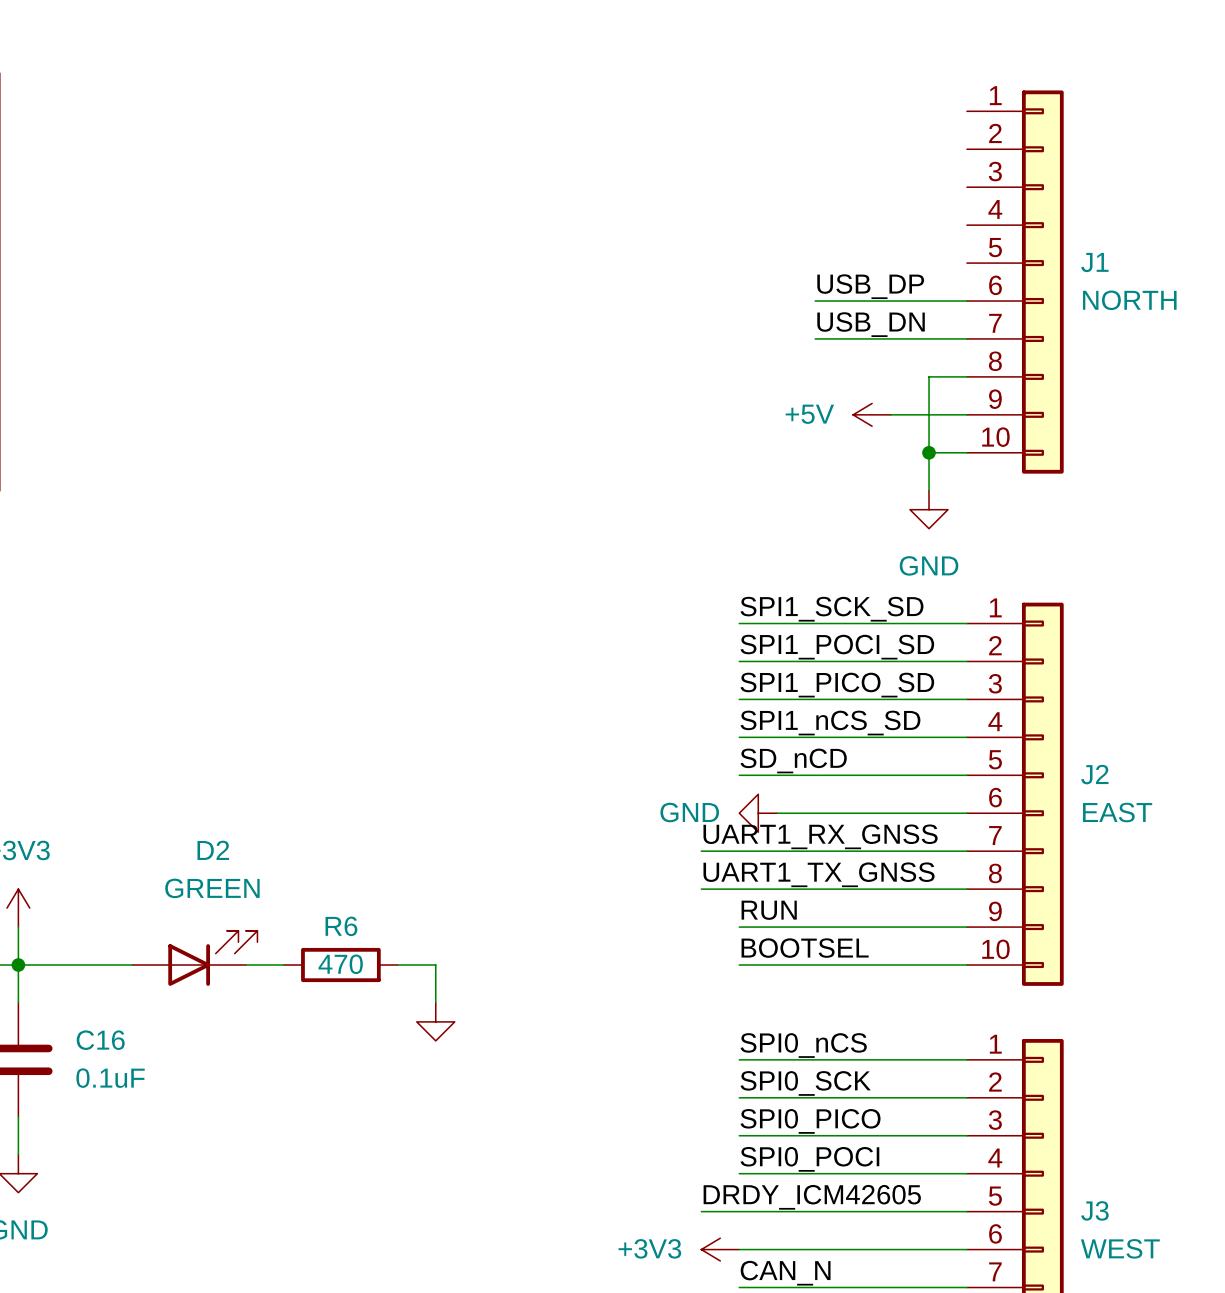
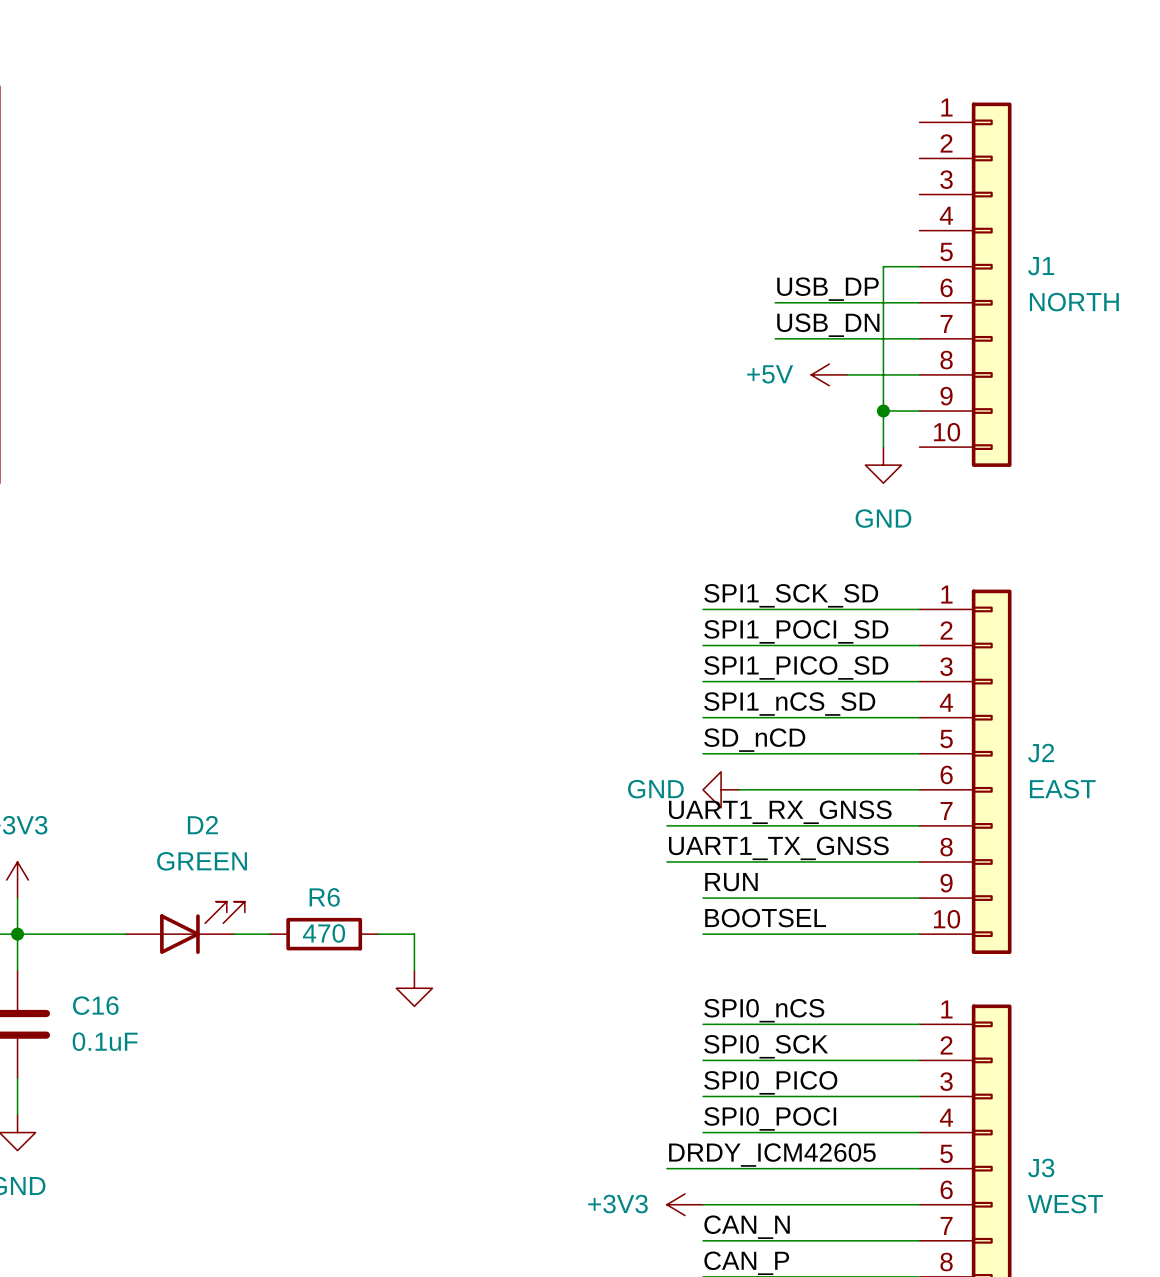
wire: none -> (919, 266) (883, 266) (883, 374) (847, 374)
power symbol position: +5V (872, 414) -> +5V (829, 374)
wire: (891, 414) (929, 414) -> none
junction position: (929, 452) -> (883, 411)
wire: (966, 452) (929, 452) (929, 490) -> none
power symbol position: GND (929, 509) -> GND (883, 465)

